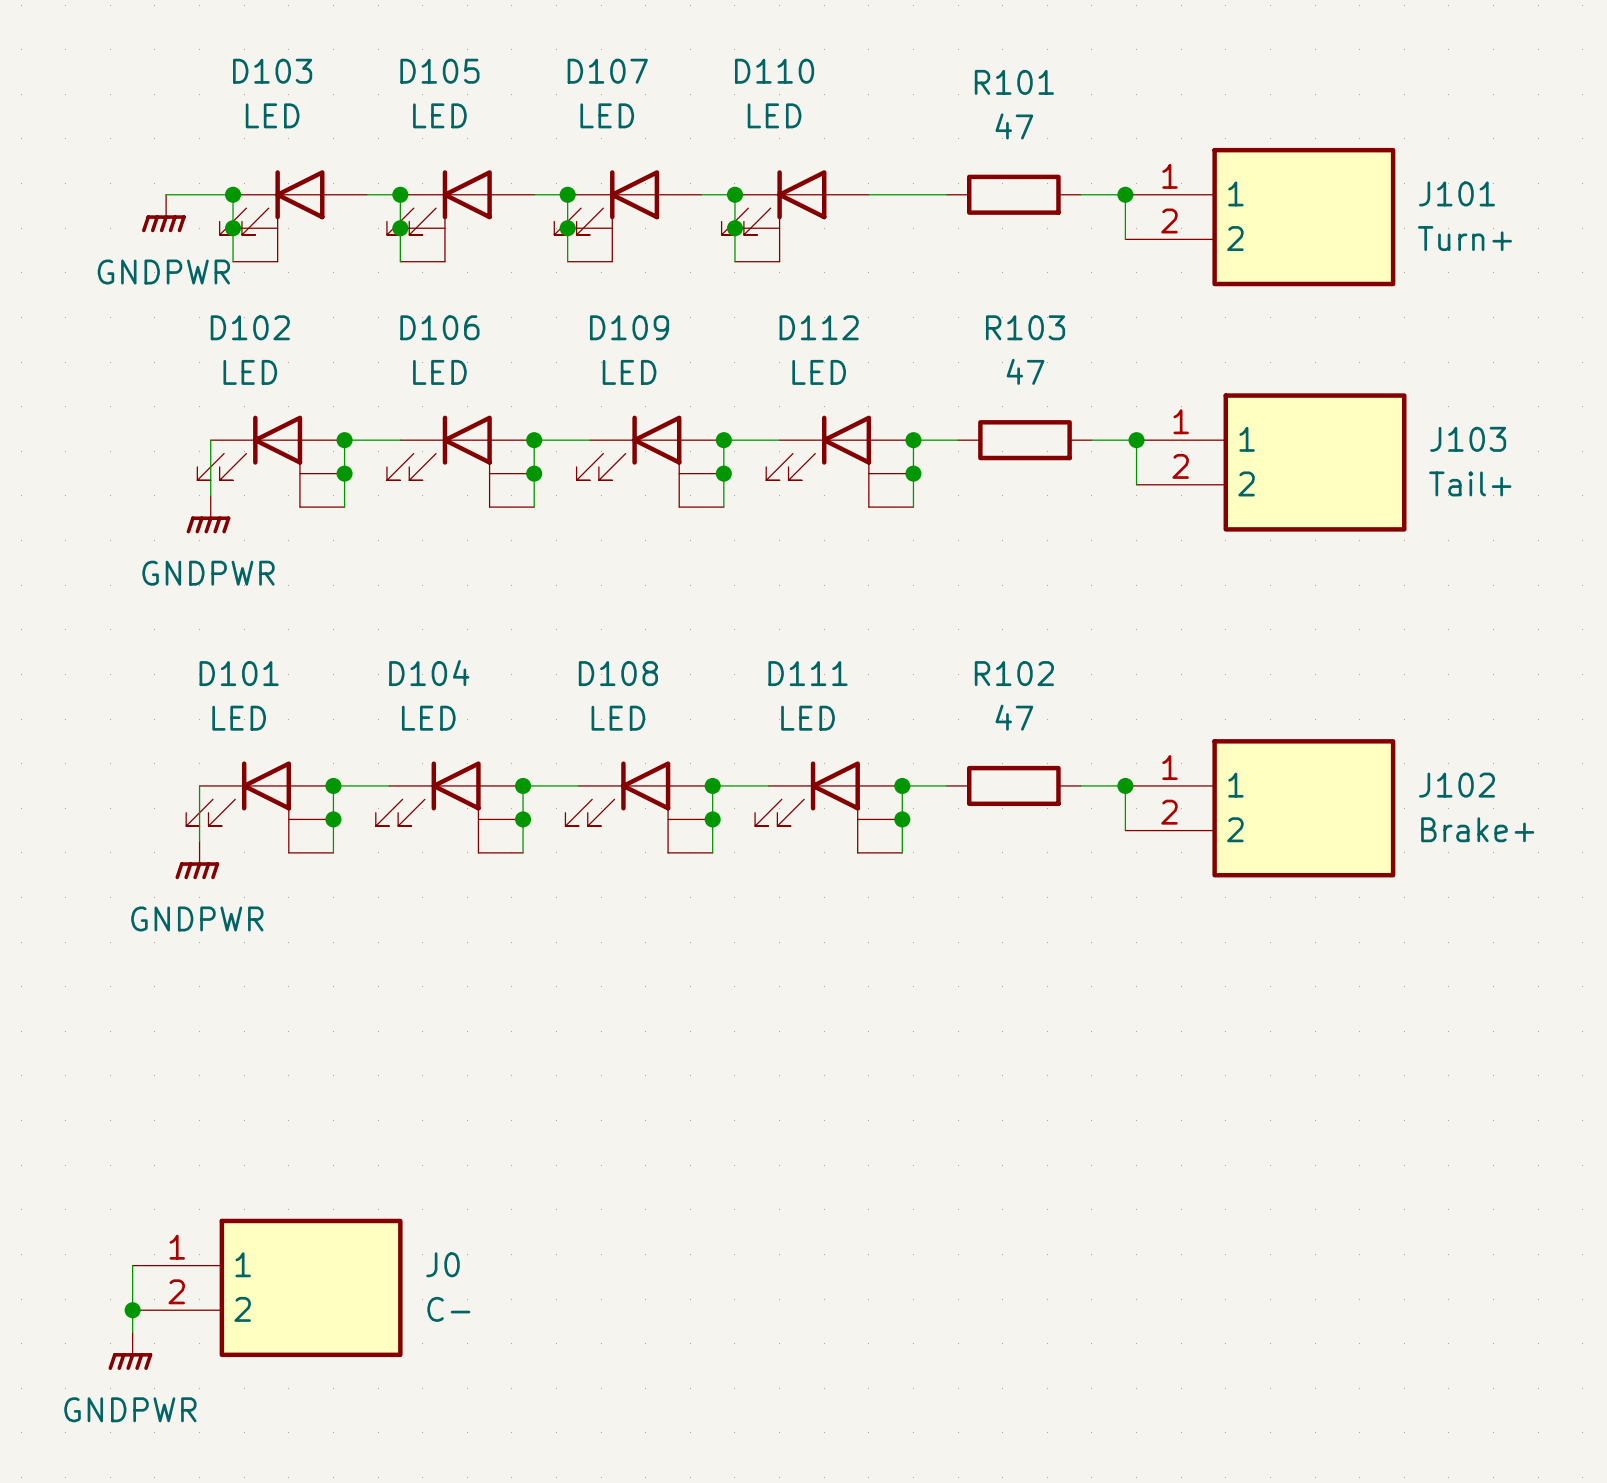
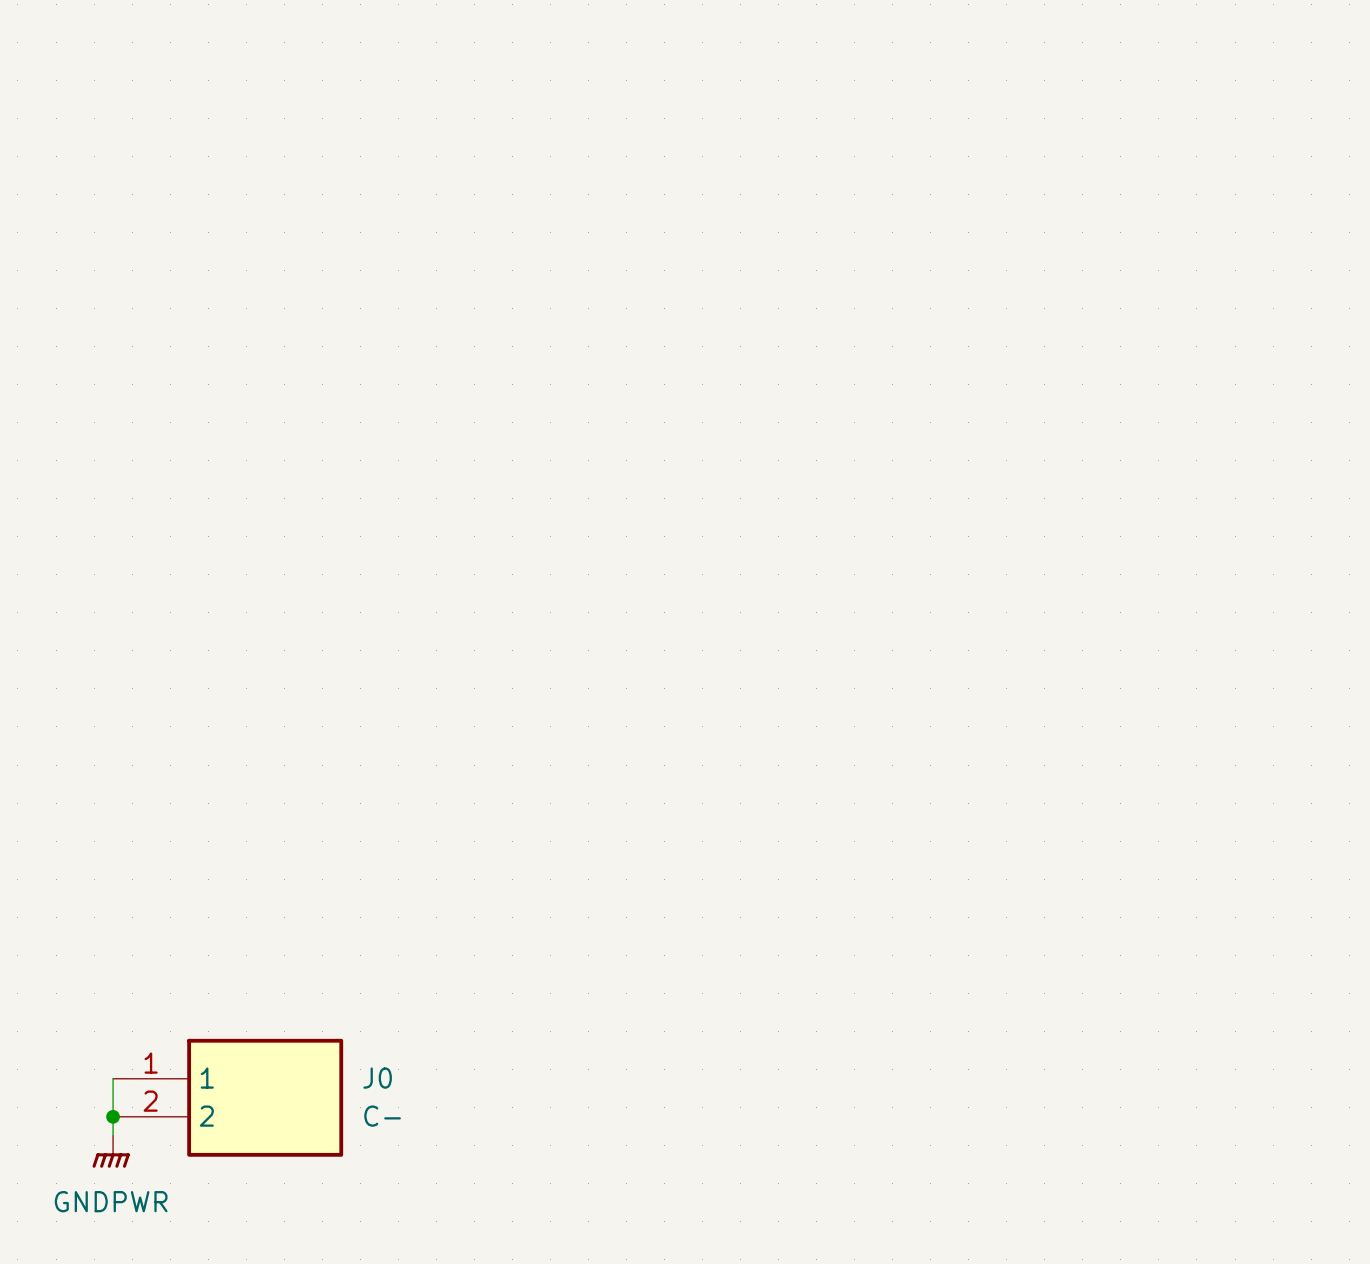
wire: (166, 194) (233, 194) (233, 261) -> none
junction: (233, 194) -> none
wire: (366, 194) (400, 194) (400, 261) -> none
junction: (400, 194) -> none
wire: (534, 194) (567, 194) (567, 261) -> none
junction: (567, 194) -> none
wire: (701, 194) (734, 194) (734, 261) -> none
junction: (734, 194) -> none
wire: (868, 194) (946, 194) -> none
R101: 47 (1013, 194) -> none
wire: (1080, 194) (1125, 194) (1125, 239) -> none
junction: (1125, 194) -> none
power symbol: GNDPWR (163, 213) -> none
D103: LED (293, 215) -> none
D105: LED (460, 215) -> none
D107: LED (627, 215) -> none
D110: LED (795, 215) -> none
J101: Turn+ (1260, 217) -> none
junction: (233, 228) -> none
junction: (400, 228) -> none
junction: (567, 228) -> none
junction: (734, 228) -> none
wire: (210, 440) (210, 495) -> none
junction: (344, 440) -> none
wire: (400, 440) (344, 440) (344, 507) -> none
junction: (534, 440) -> none
wire: (589, 440) (534, 440) (534, 507) -> none
junction: (723, 440) -> none
wire: (779, 440) (723, 440) (723, 507) -> none
junction: (913, 440) -> none
wire: (958, 440) (913, 440) (913, 507) -> none
R103: 47 (1025, 440) -> none
wire: (1091, 440) (1136, 440) (1136, 484) -> none
junction: (1136, 440) -> none
D102: LED (270, 461) -> none
D106: LED (460, 461) -> none
D109: LED (650, 461) -> none
D112: LED (839, 461) -> none
J103: Tail+ (1271, 462) -> none
junction: (344, 473) -> none
junction: (534, 473) -> none
junction: (723, 473) -> none
junction: (913, 473) -> none
power symbol: GNDPWR (208, 514) -> none
wire: (199, 785) (199, 841) -> none
junction: (333, 785) -> none
wire: (389, 785) (333, 785) (333, 852) -> none
junction: (523, 785) -> none
wire: (578, 785) (523, 785) (523, 852) -> none
junction: (712, 785) -> none
wire: (768, 785) (712, 785) (712, 852) -> none
junction: (902, 785) -> none
wire: (946, 785) (902, 785) (902, 852) -> none
R102: 47 (1013, 785) -> none
wire: (1080, 785) (1125, 785) (1125, 830) -> none
junction: (1125, 785) -> none
D101: LED (259, 807) -> none
D104: LED (449, 807) -> none
D108: LED (639, 807) -> none
D111: LED (828, 807) -> none
J102: Brake+ (1260, 808) -> none
junction: (333, 819) -> none
junction: (523, 819) -> none
junction: (712, 819) -> none
junction: (902, 819) -> none
power symbol: GNDPWR (197, 860) -> none

